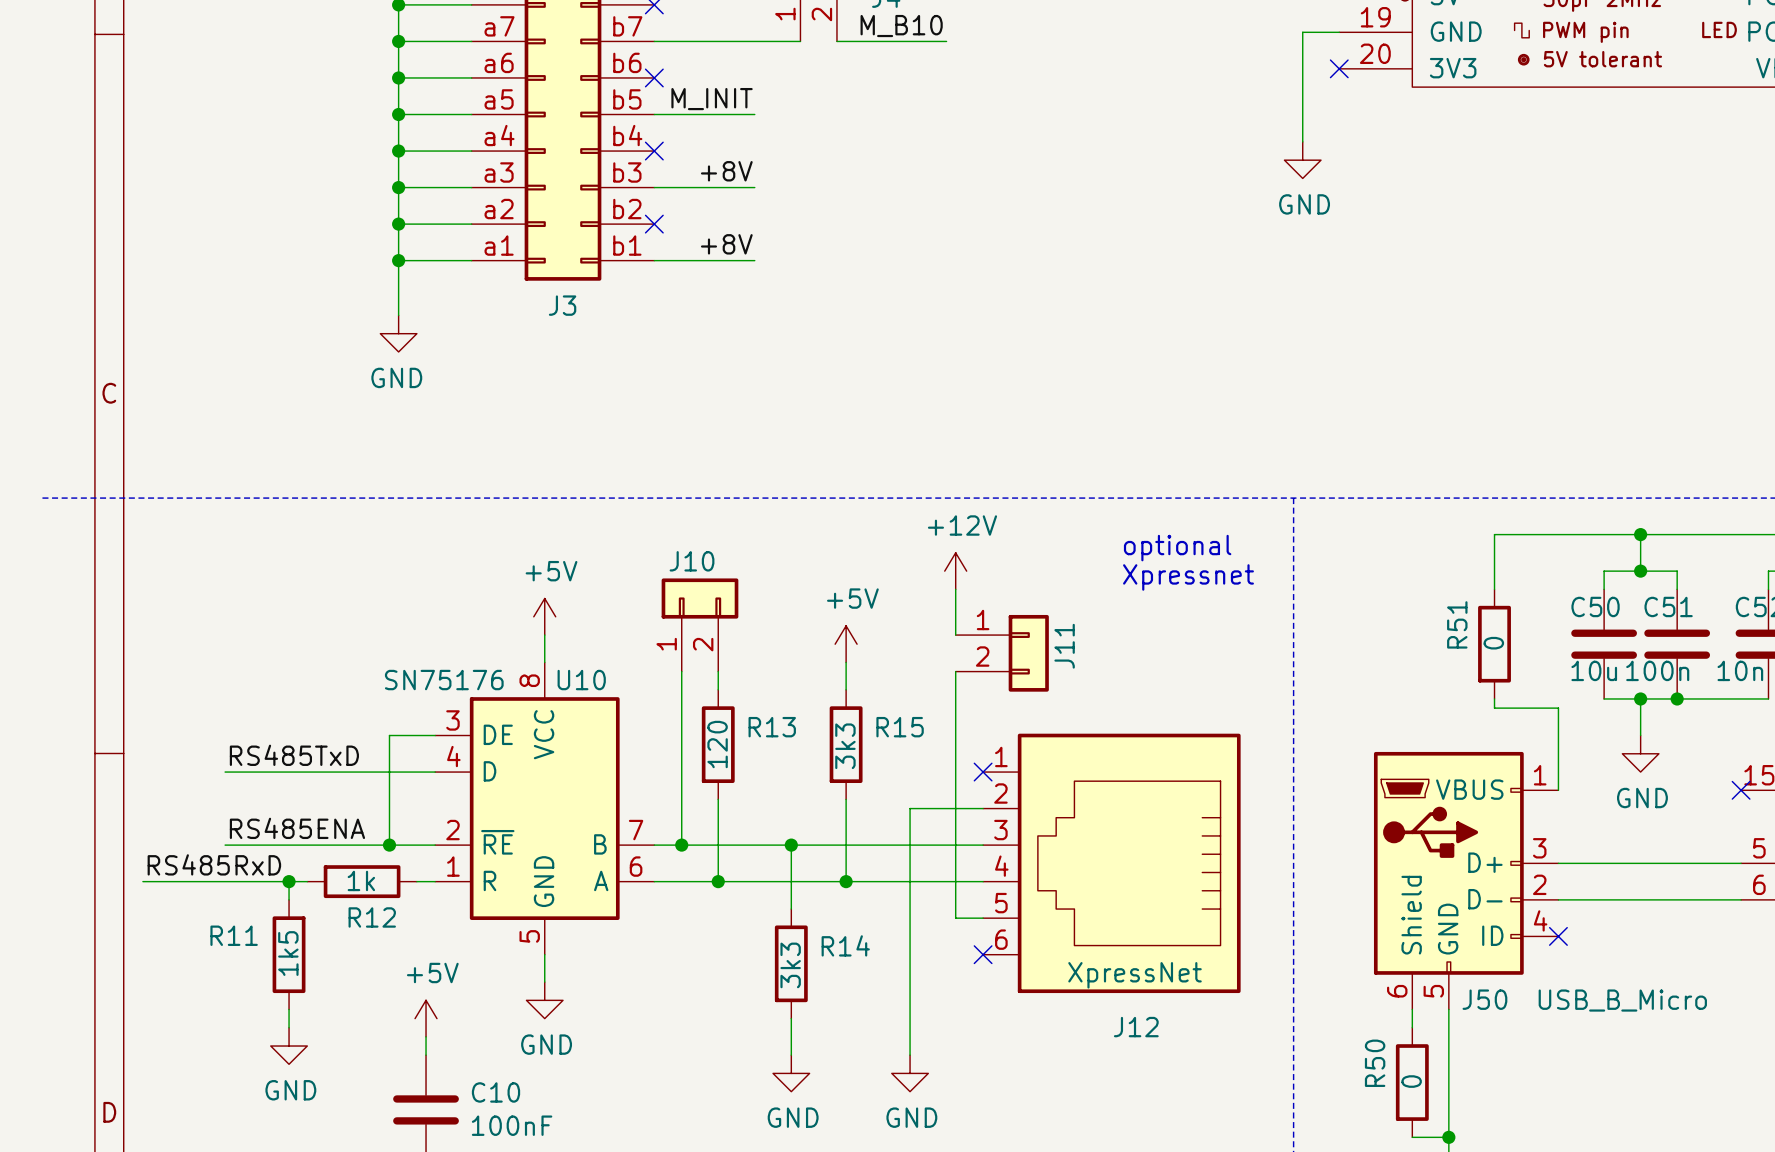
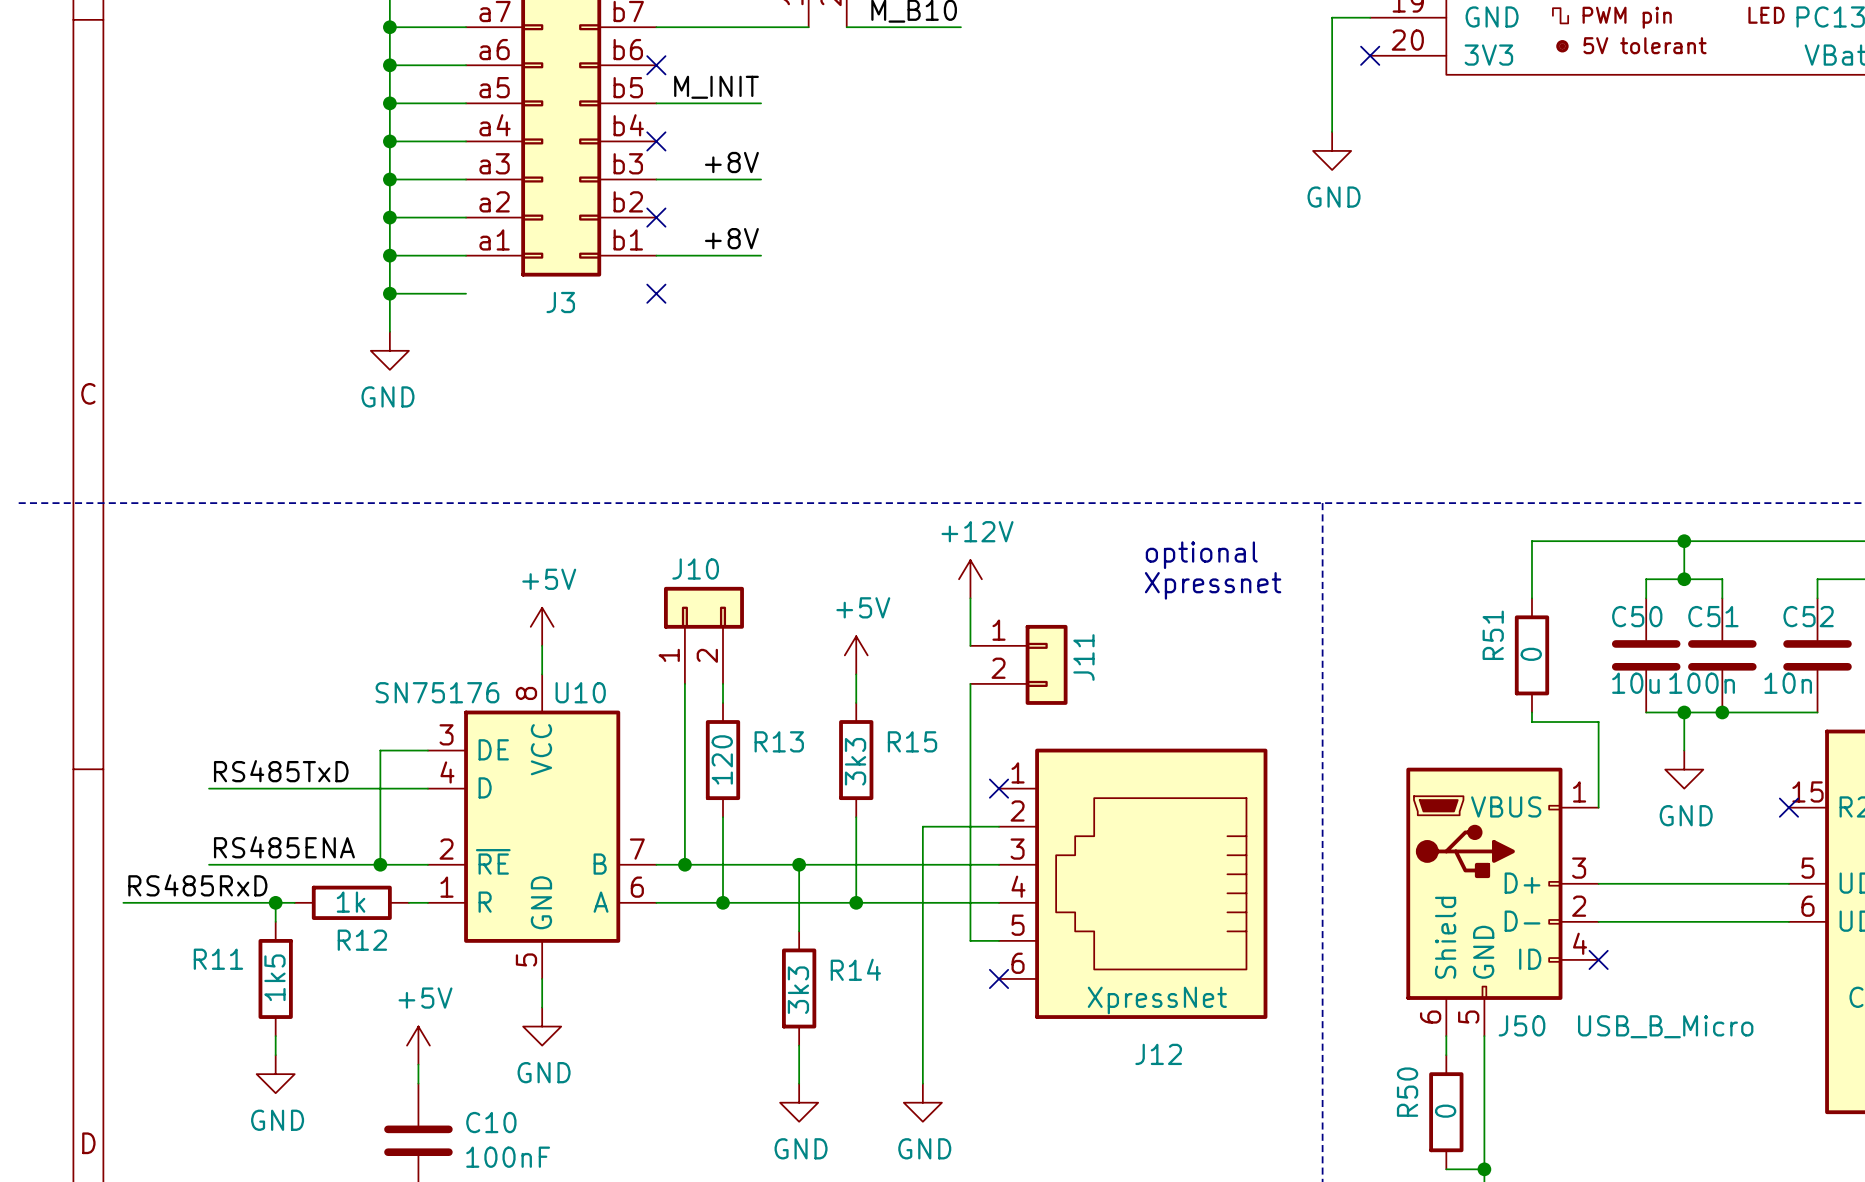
wire: none -> (389, 293) (466, 293)
junction: none -> (389, 293)
no-connect mark: none -> (656, 293)
power symbol position: GND (398, 333) -> GND (389, 350)

